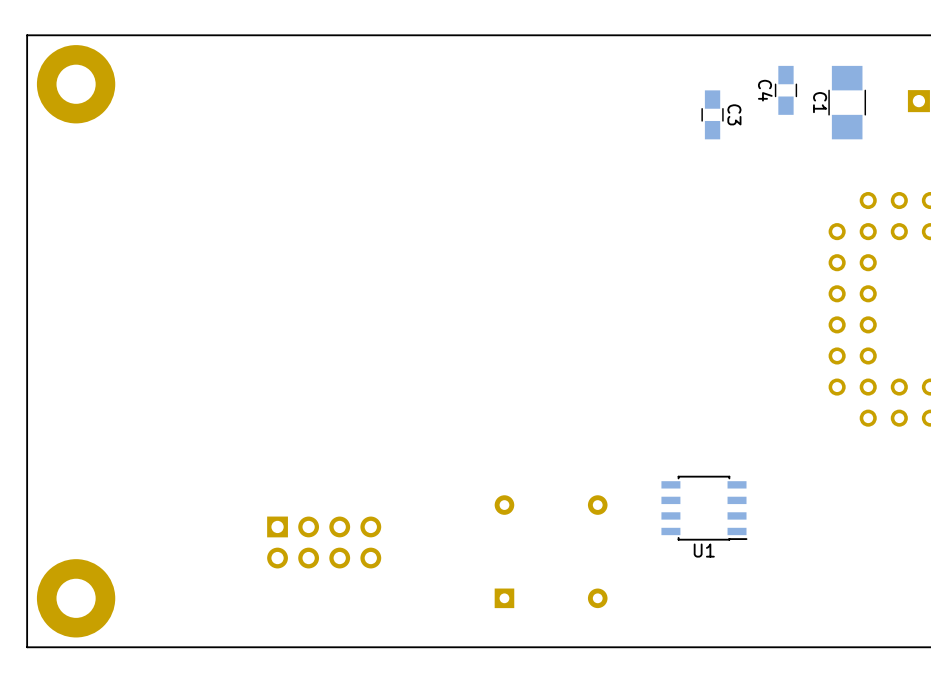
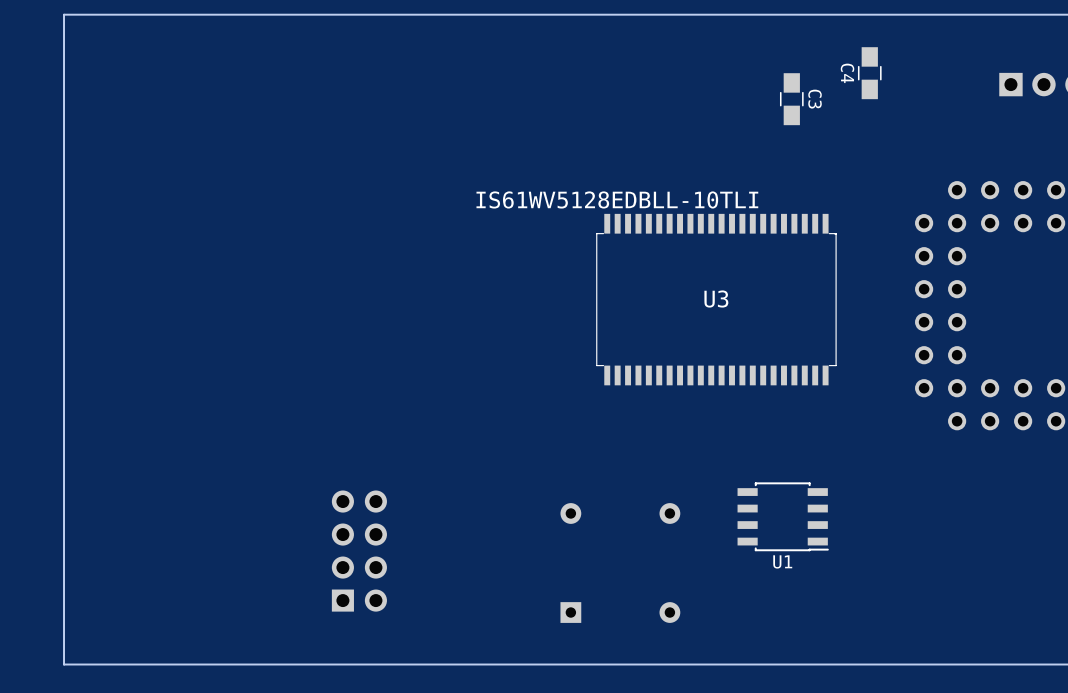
part: (76, 84) -> none
C1: (847, 102) -> none
U3: none -> IS61WV5128EDBLL-10TLI (716, 299)
part rotation: 0° (324, 542) -> 90° counterclockwise (359, 551)
part: (76, 598) -> none

